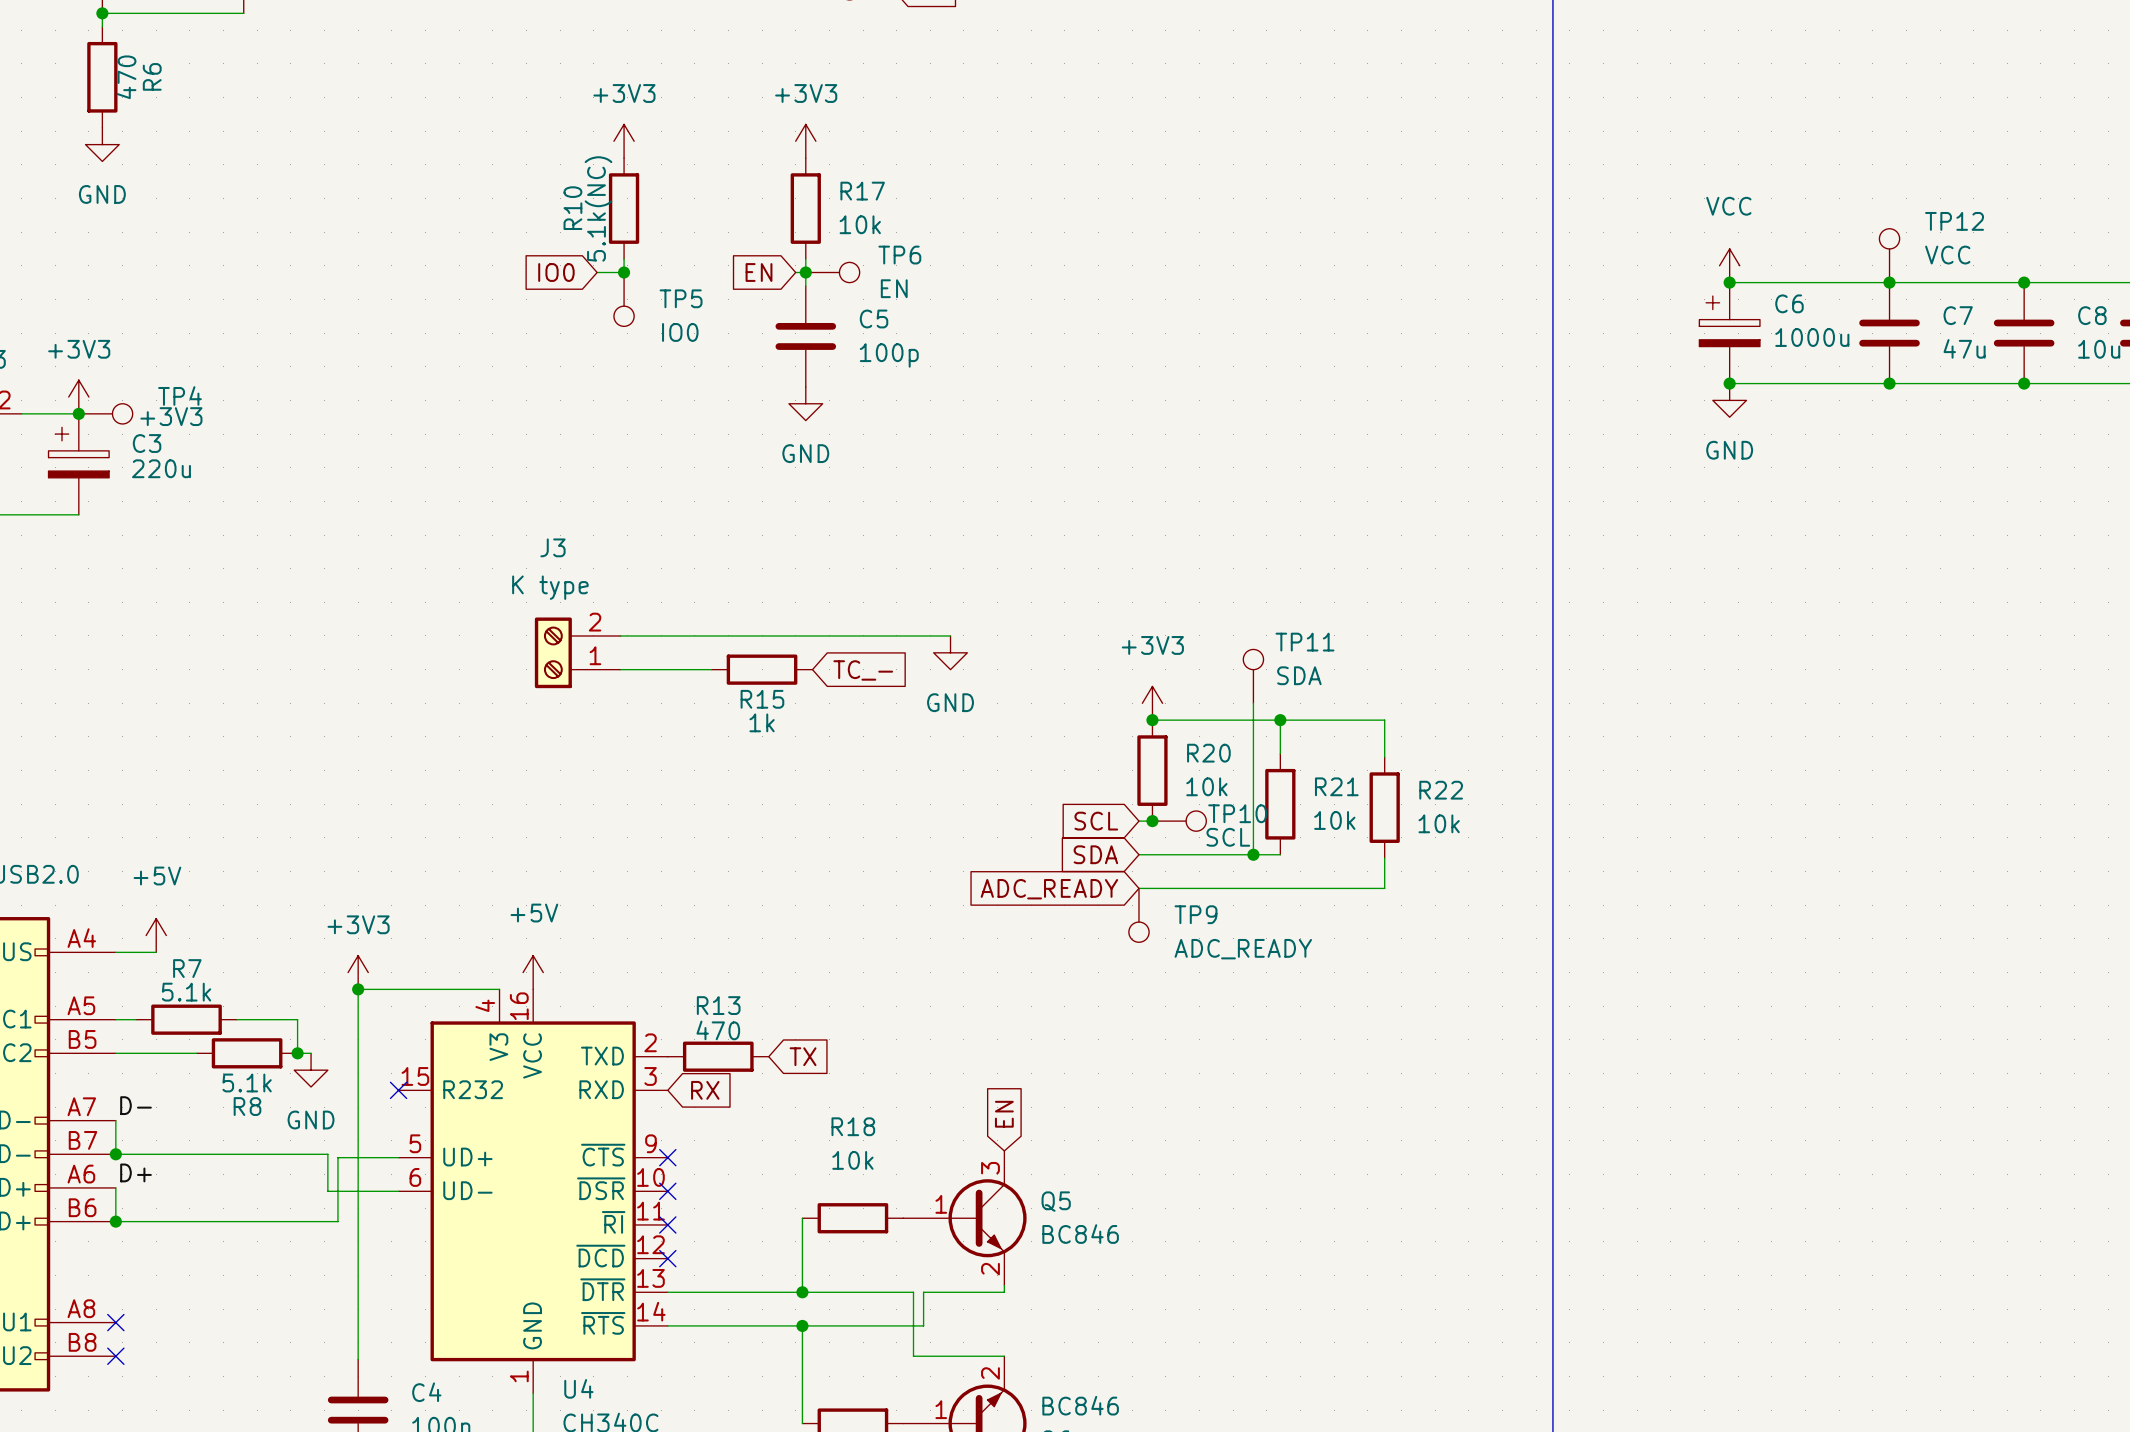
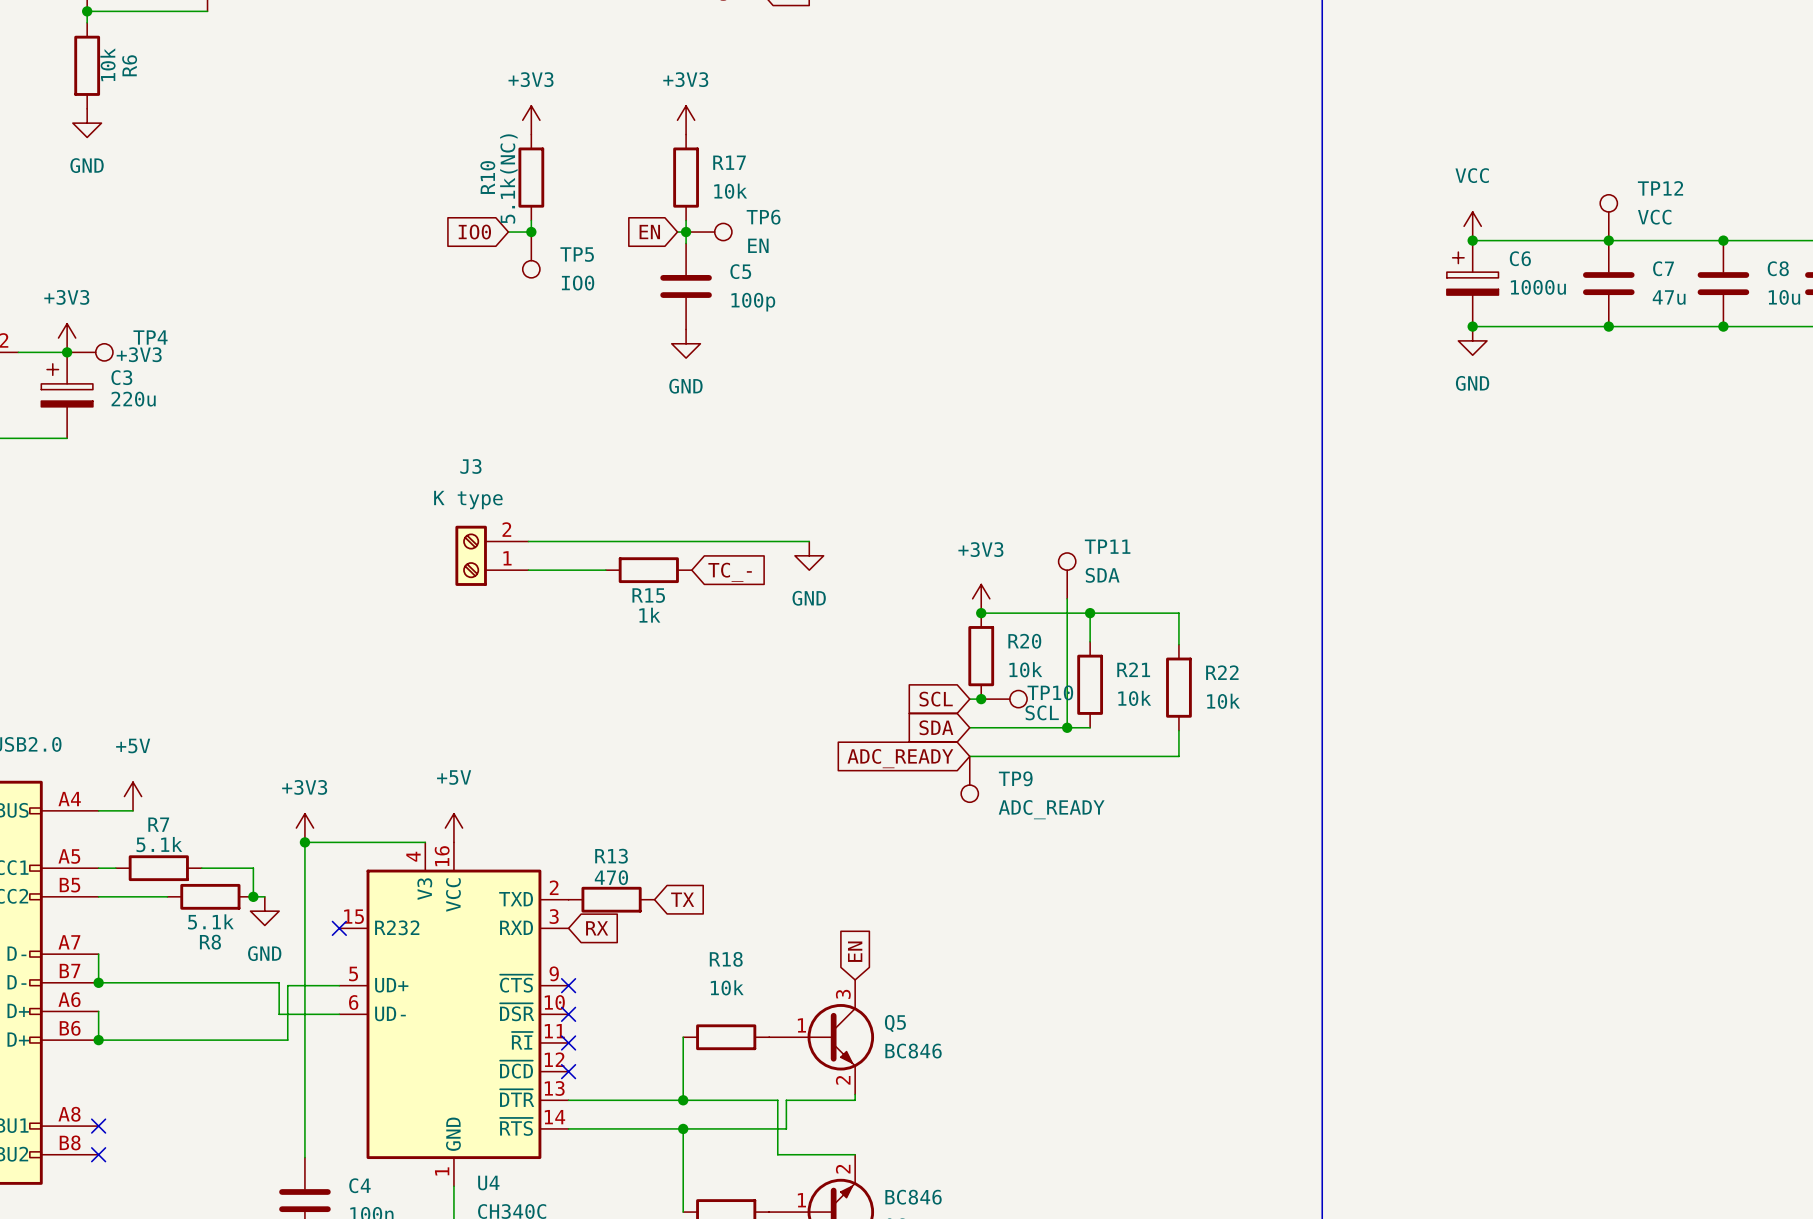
R6 value: 470 (126, 77) -> 10k (107, 64)
label: D- (136, 1105) -> none
label: D+ (136, 1172) -> none

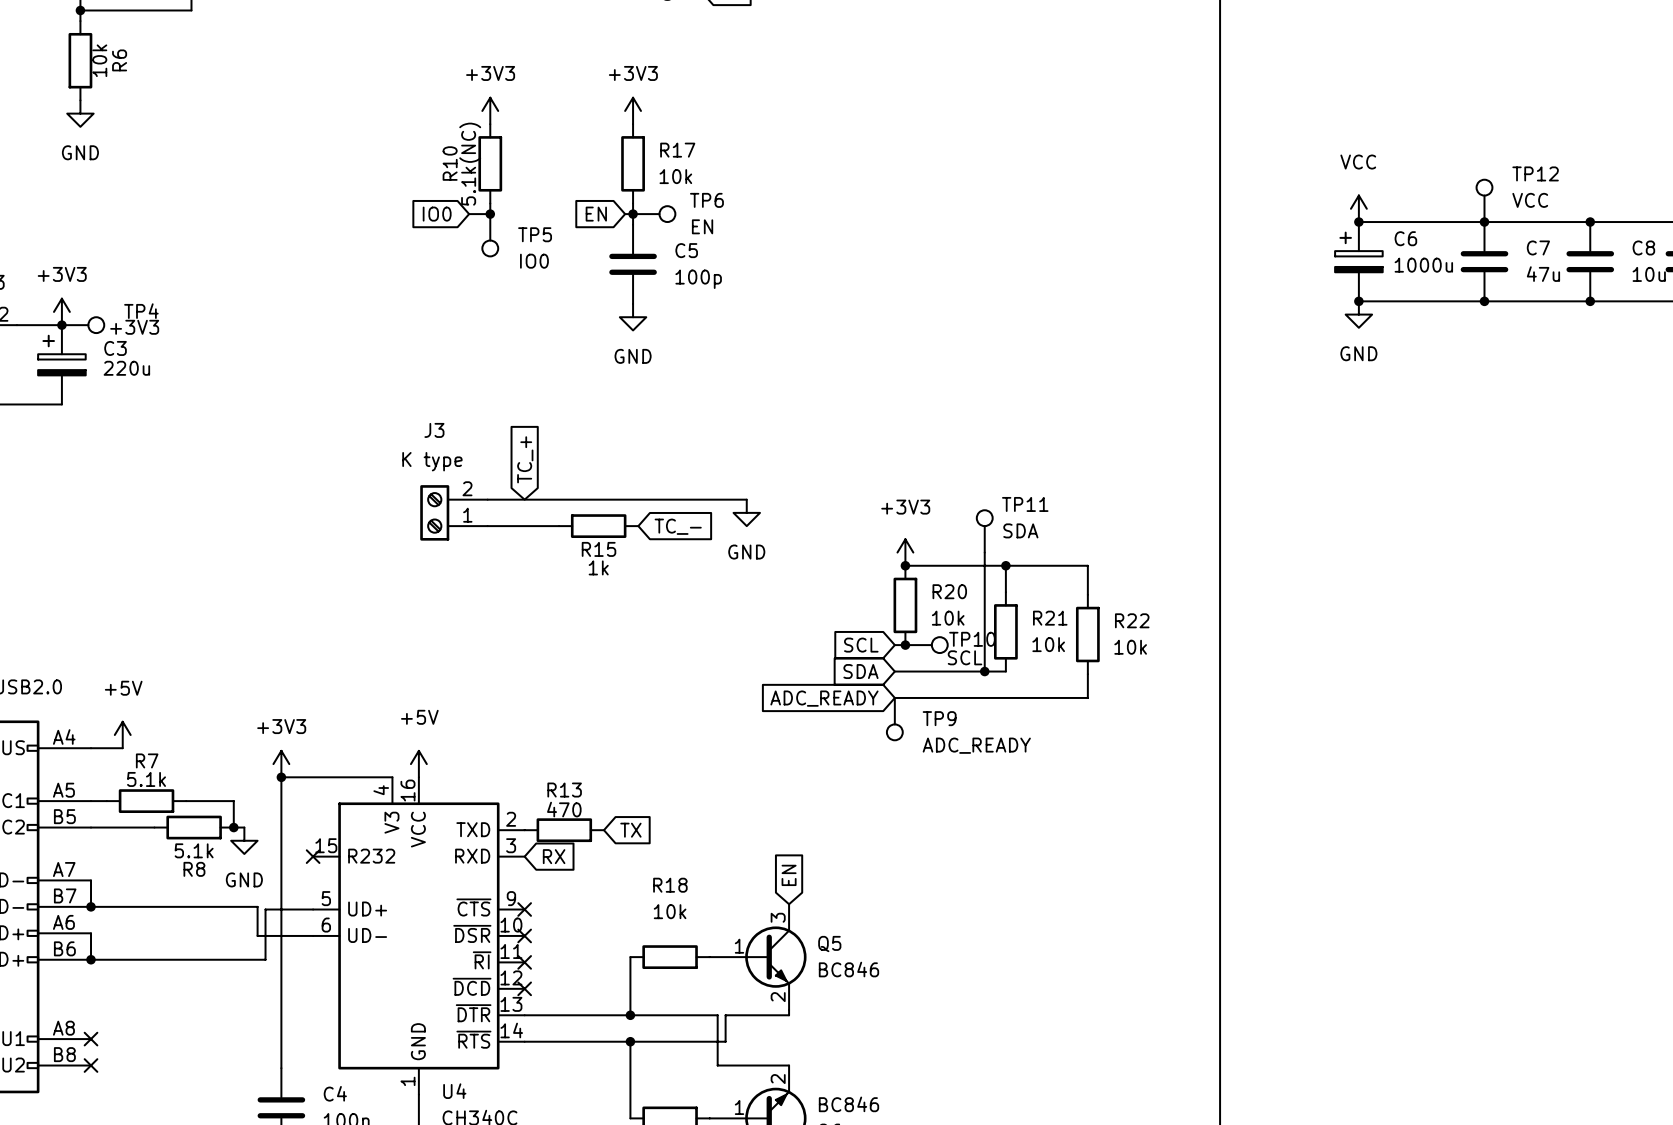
global label: none -> TC_+ (525, 459)

